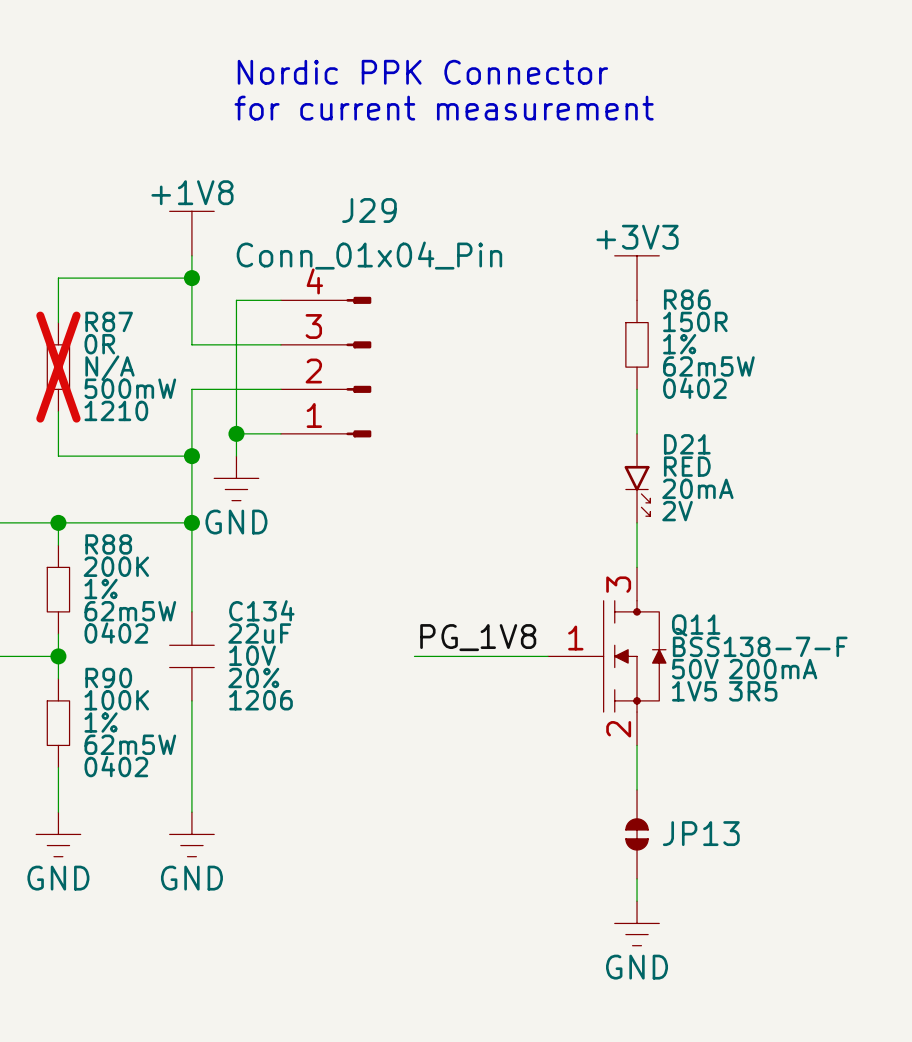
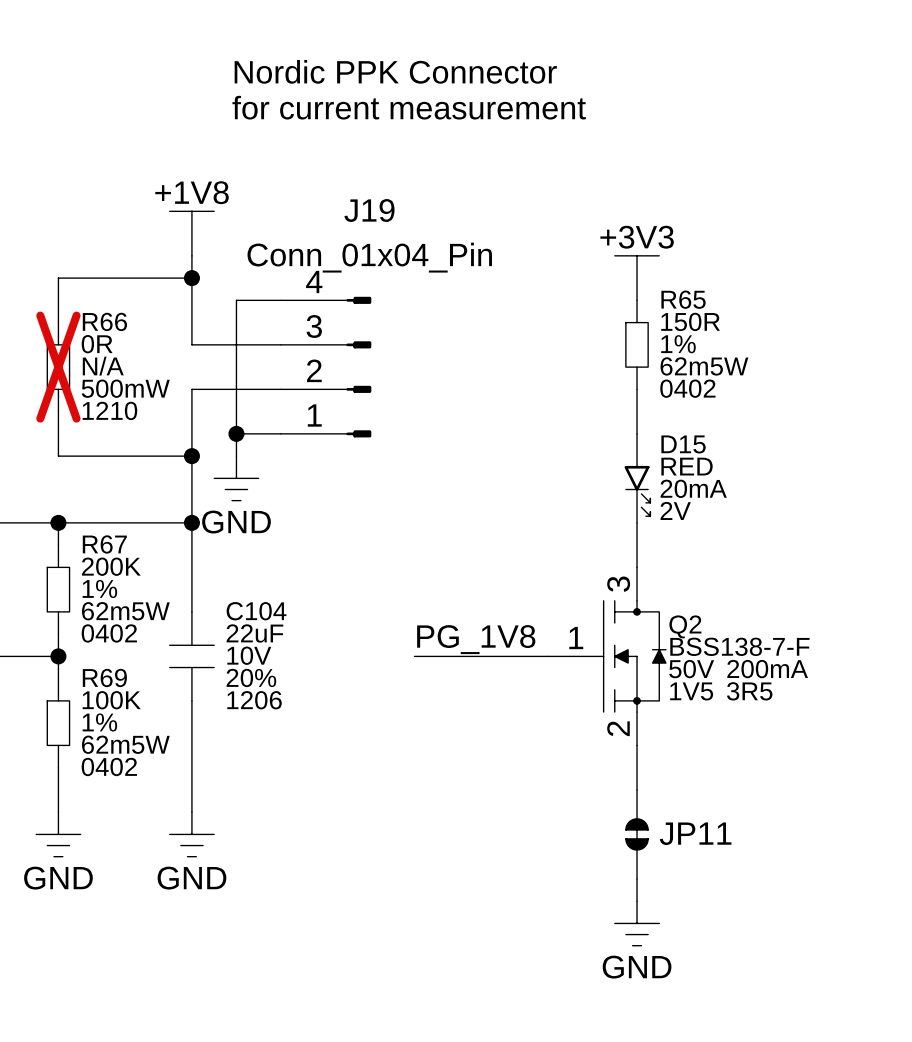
J29 name: J29 (369, 210) -> J19 (369, 210)
R86 name: R86 (687, 299) -> R65 (683, 299)
R87 name: R87 (109, 321) -> R66 (104, 321)
D21 name: D21 (687, 444) -> D15 (683, 444)
R88 name: R88 (108, 544) -> R67 (104, 544)
C134 name: C134 (261, 610) -> C104 (256, 611)
Q11 name: Q11 (696, 625) -> Q2 (685, 626)
R90 name: R90 (108, 677) -> R69 (104, 677)
JP13 name: JP13 (701, 833) -> JP11 (695, 833)

